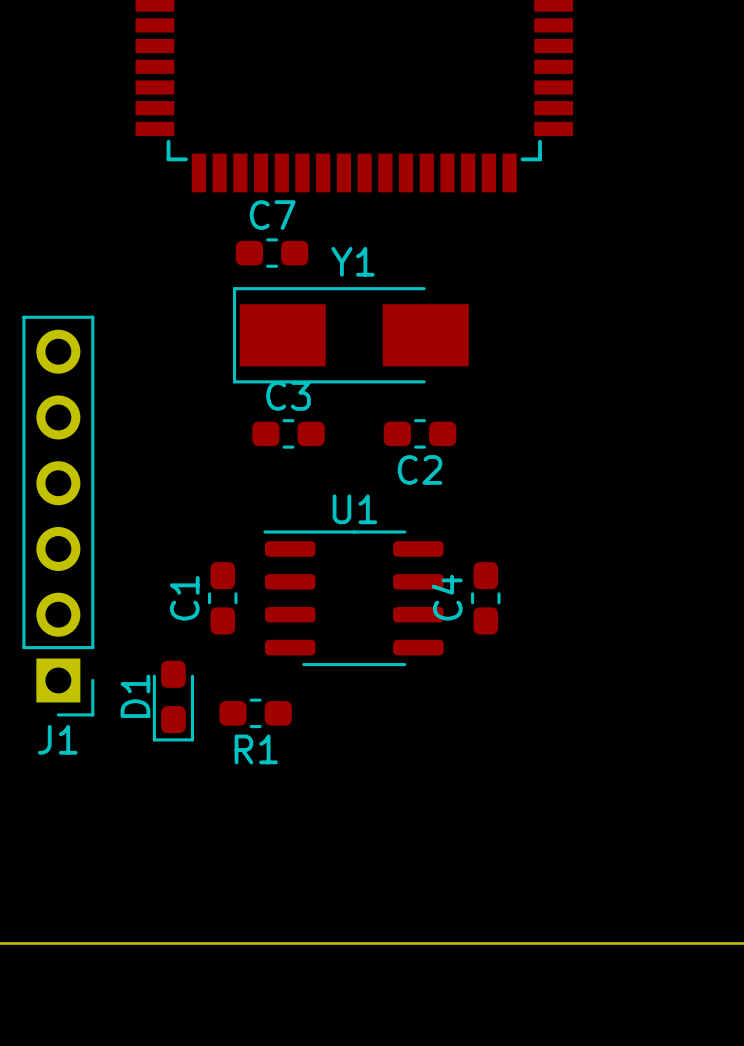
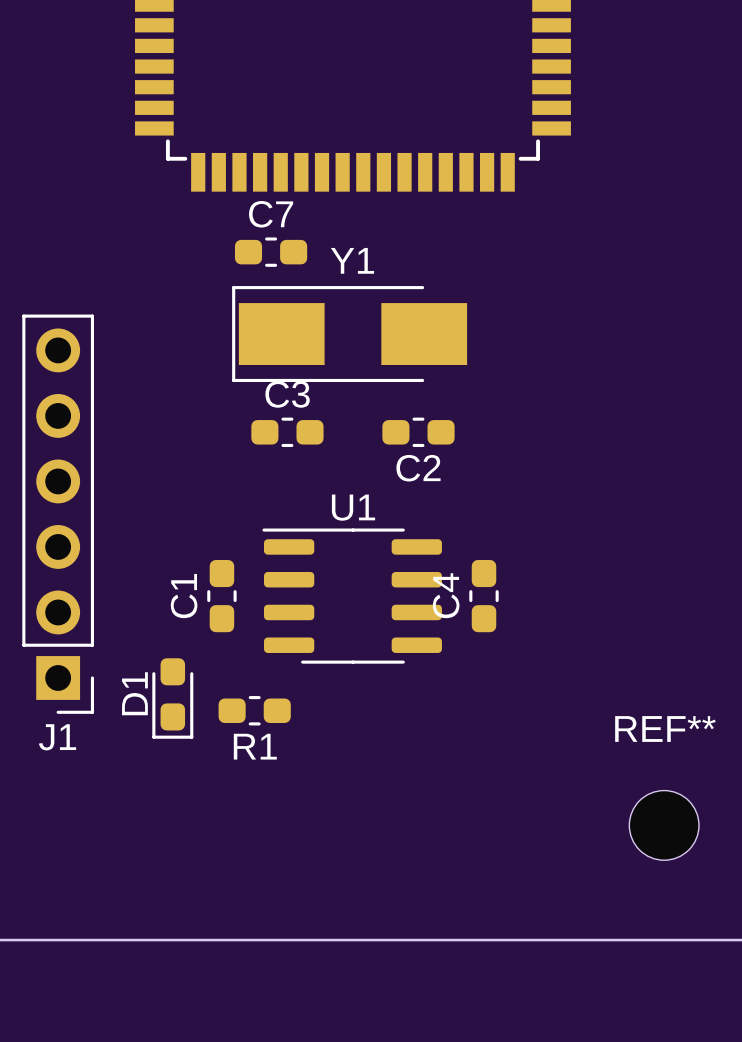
REF**: none -> (664, 825)

